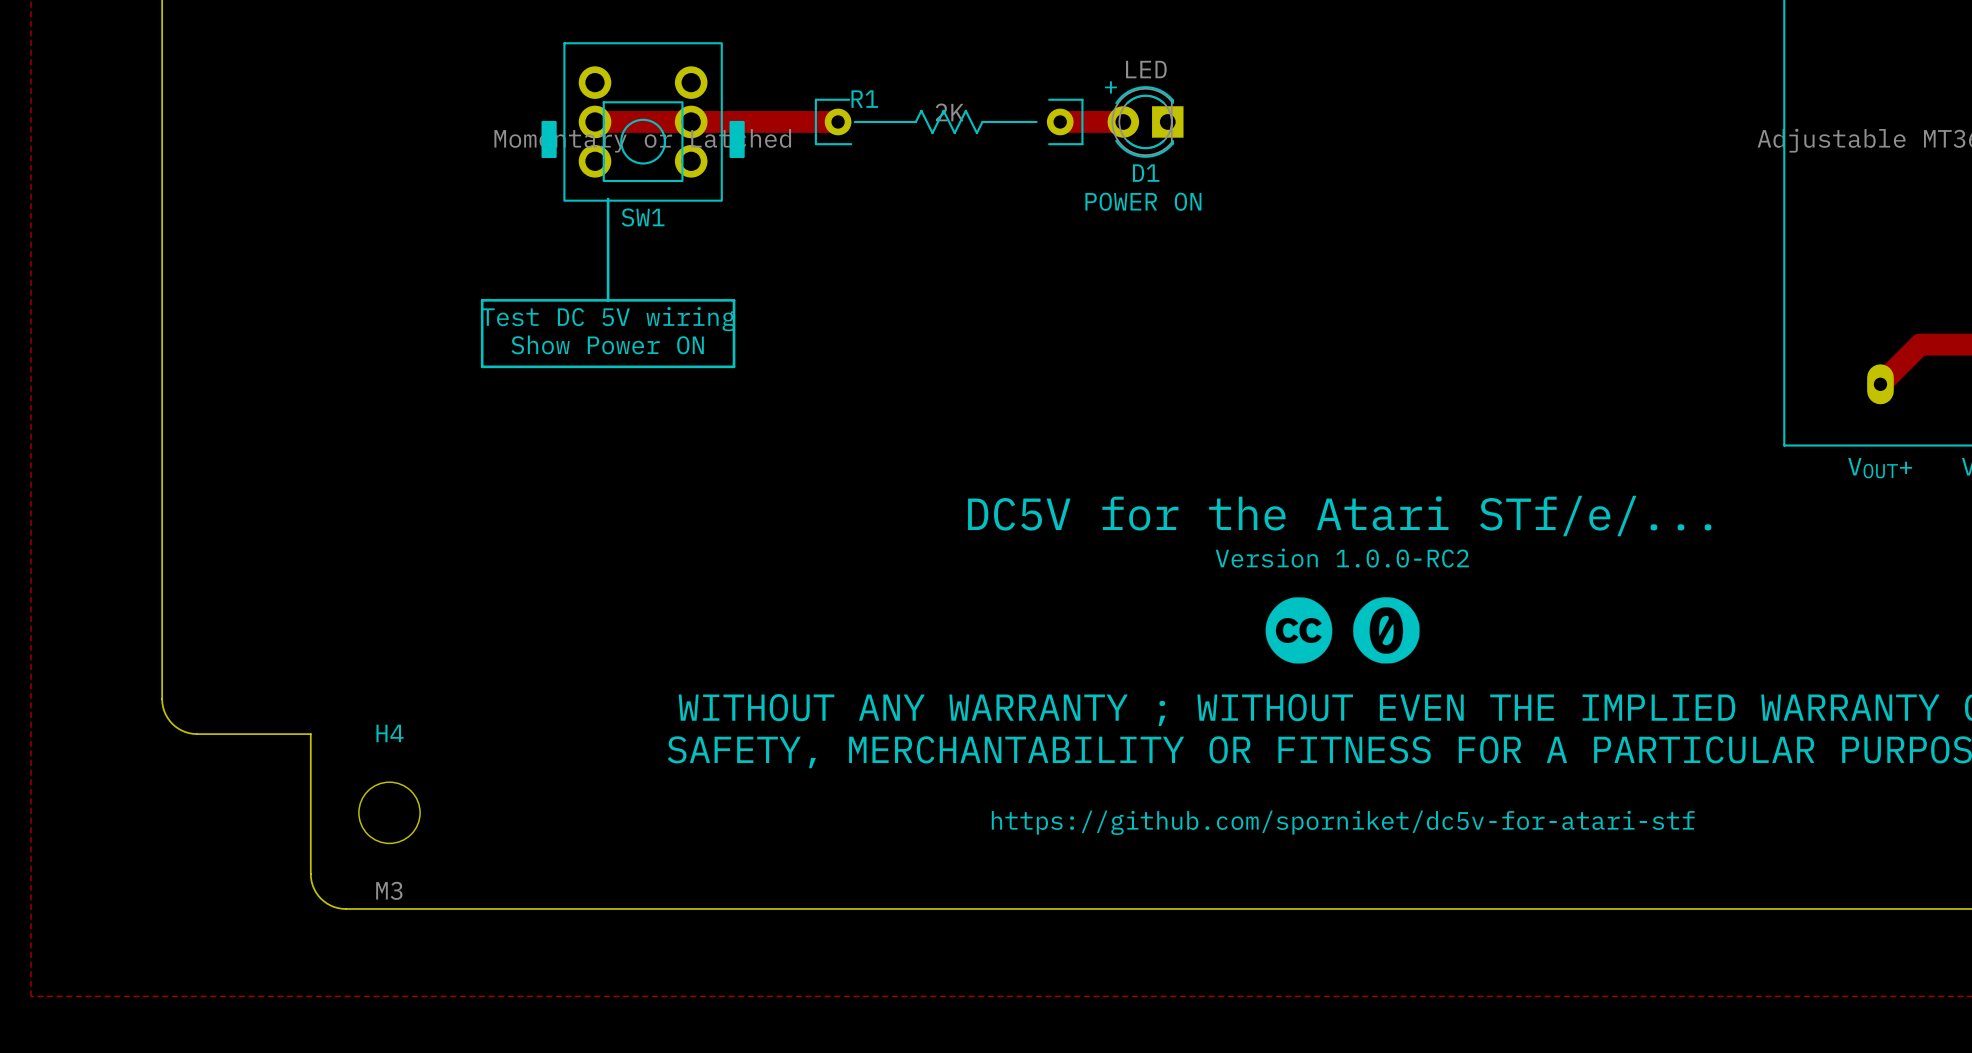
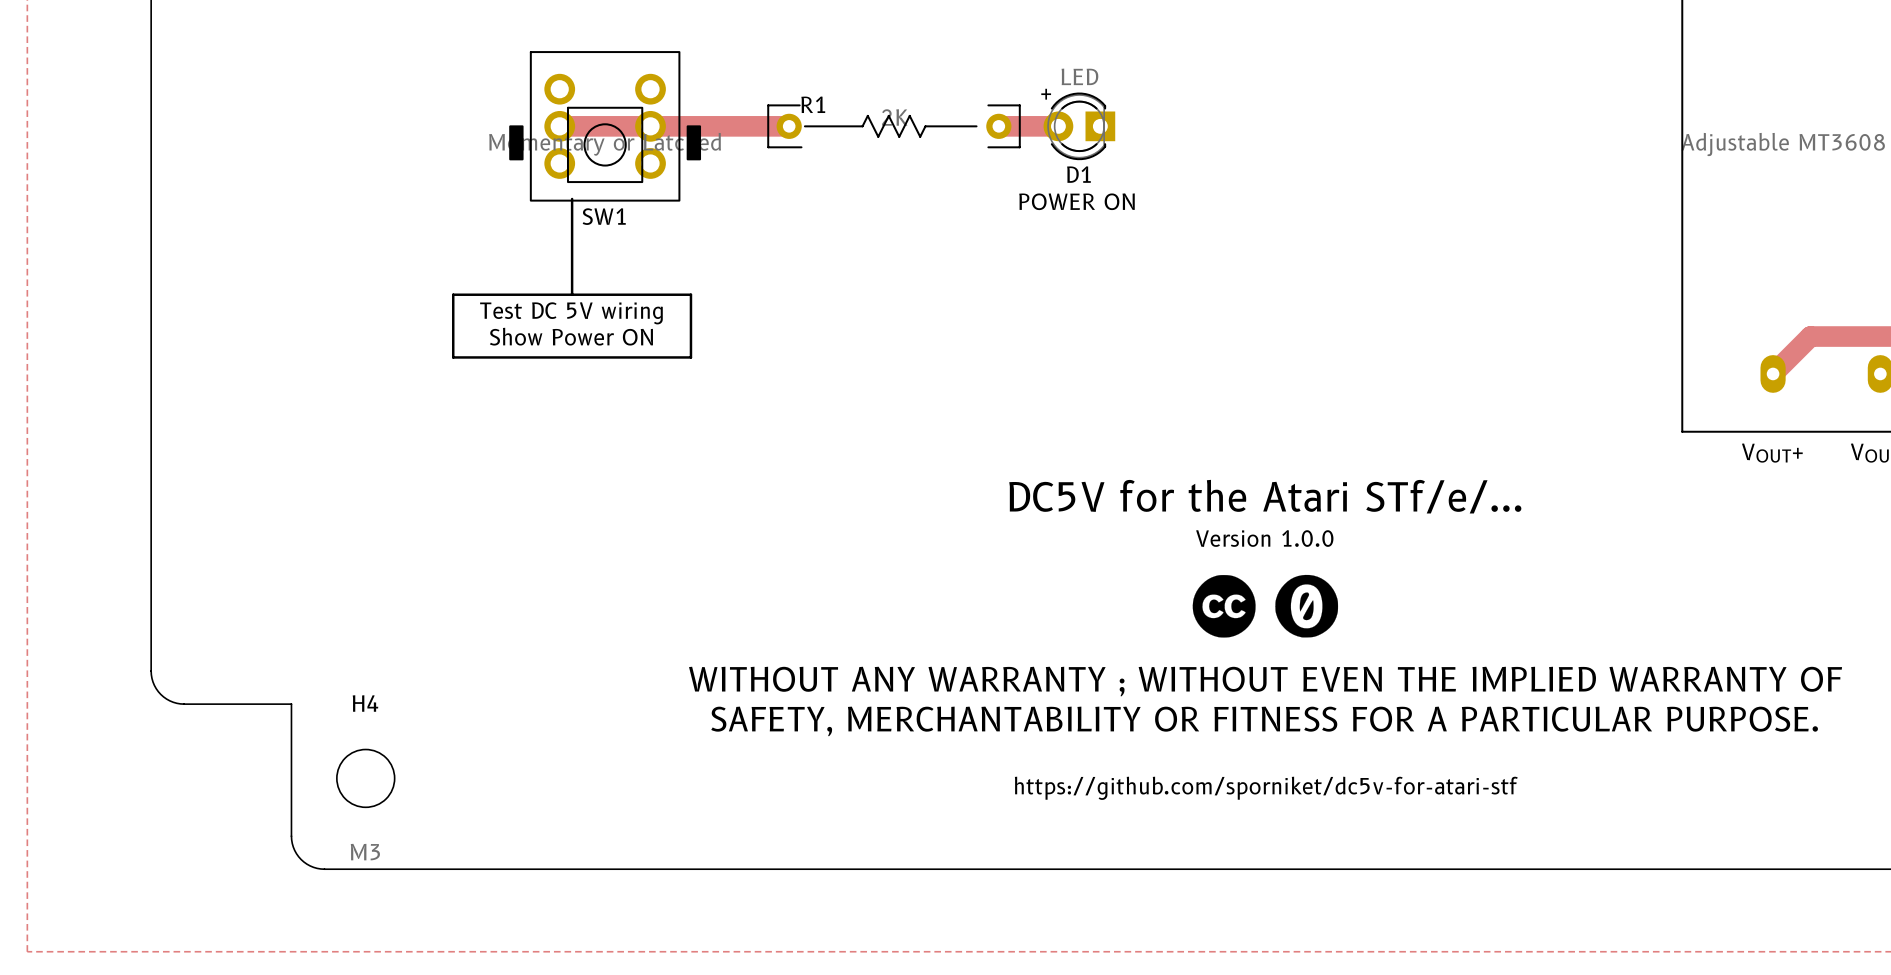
text: Version 1.0.0-RC2 (1342, 558) -> Version 1.0.0 (1264, 538)

